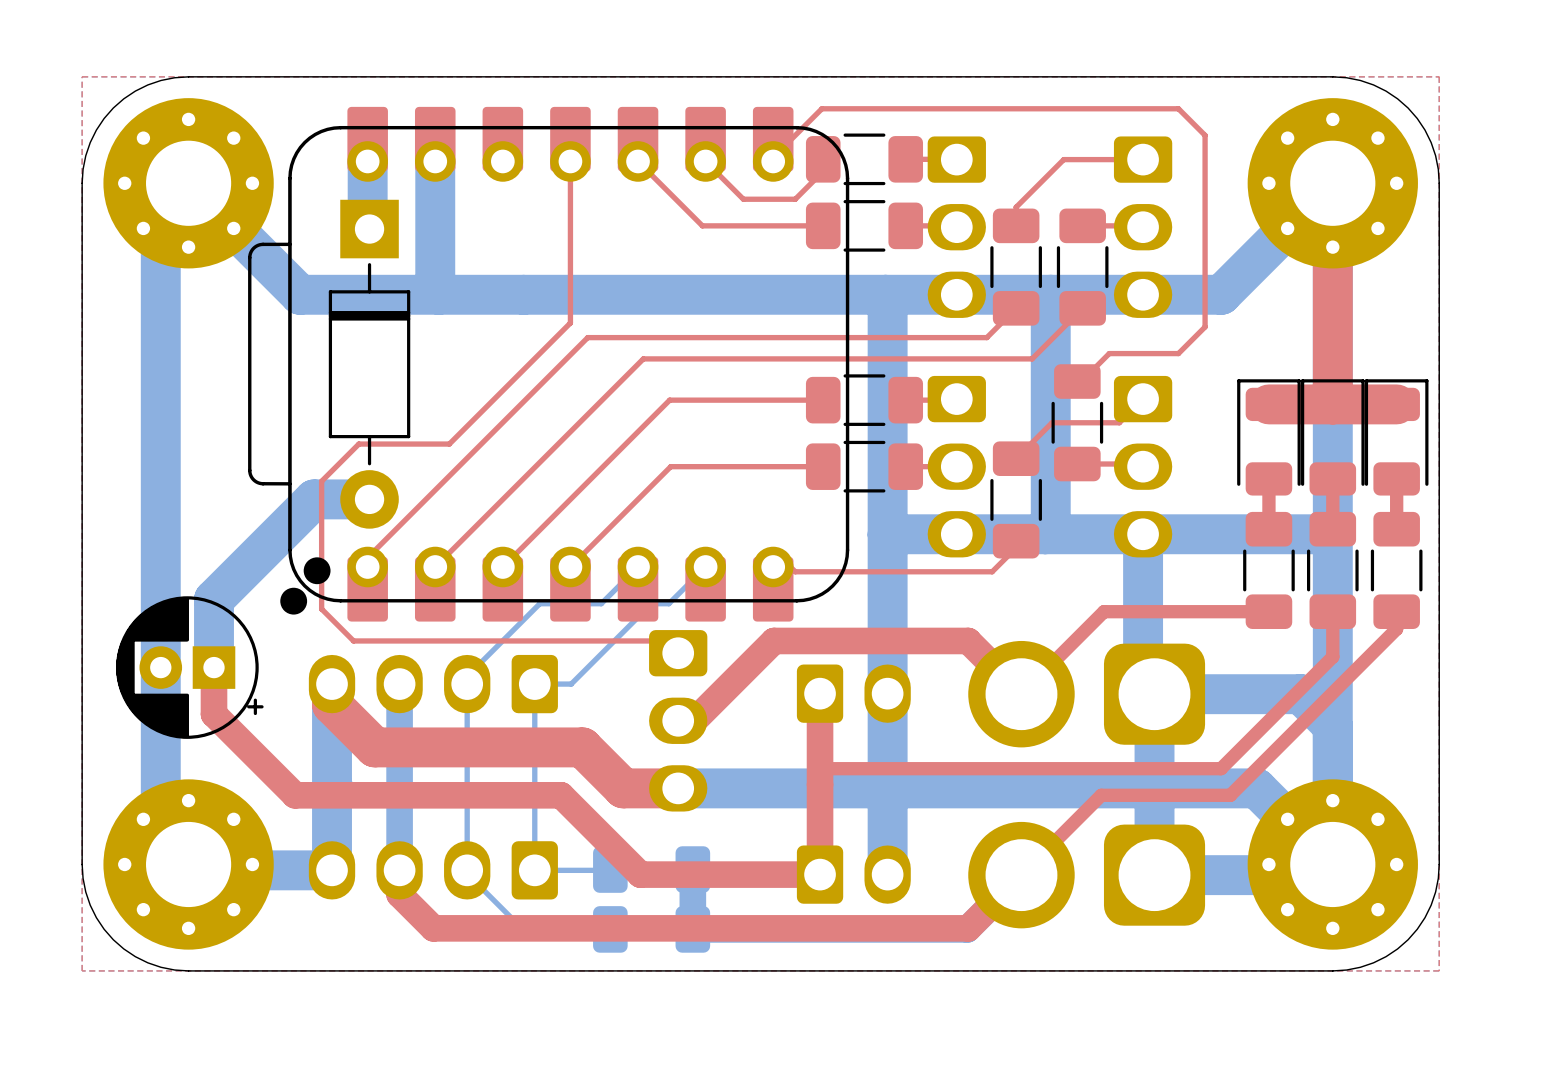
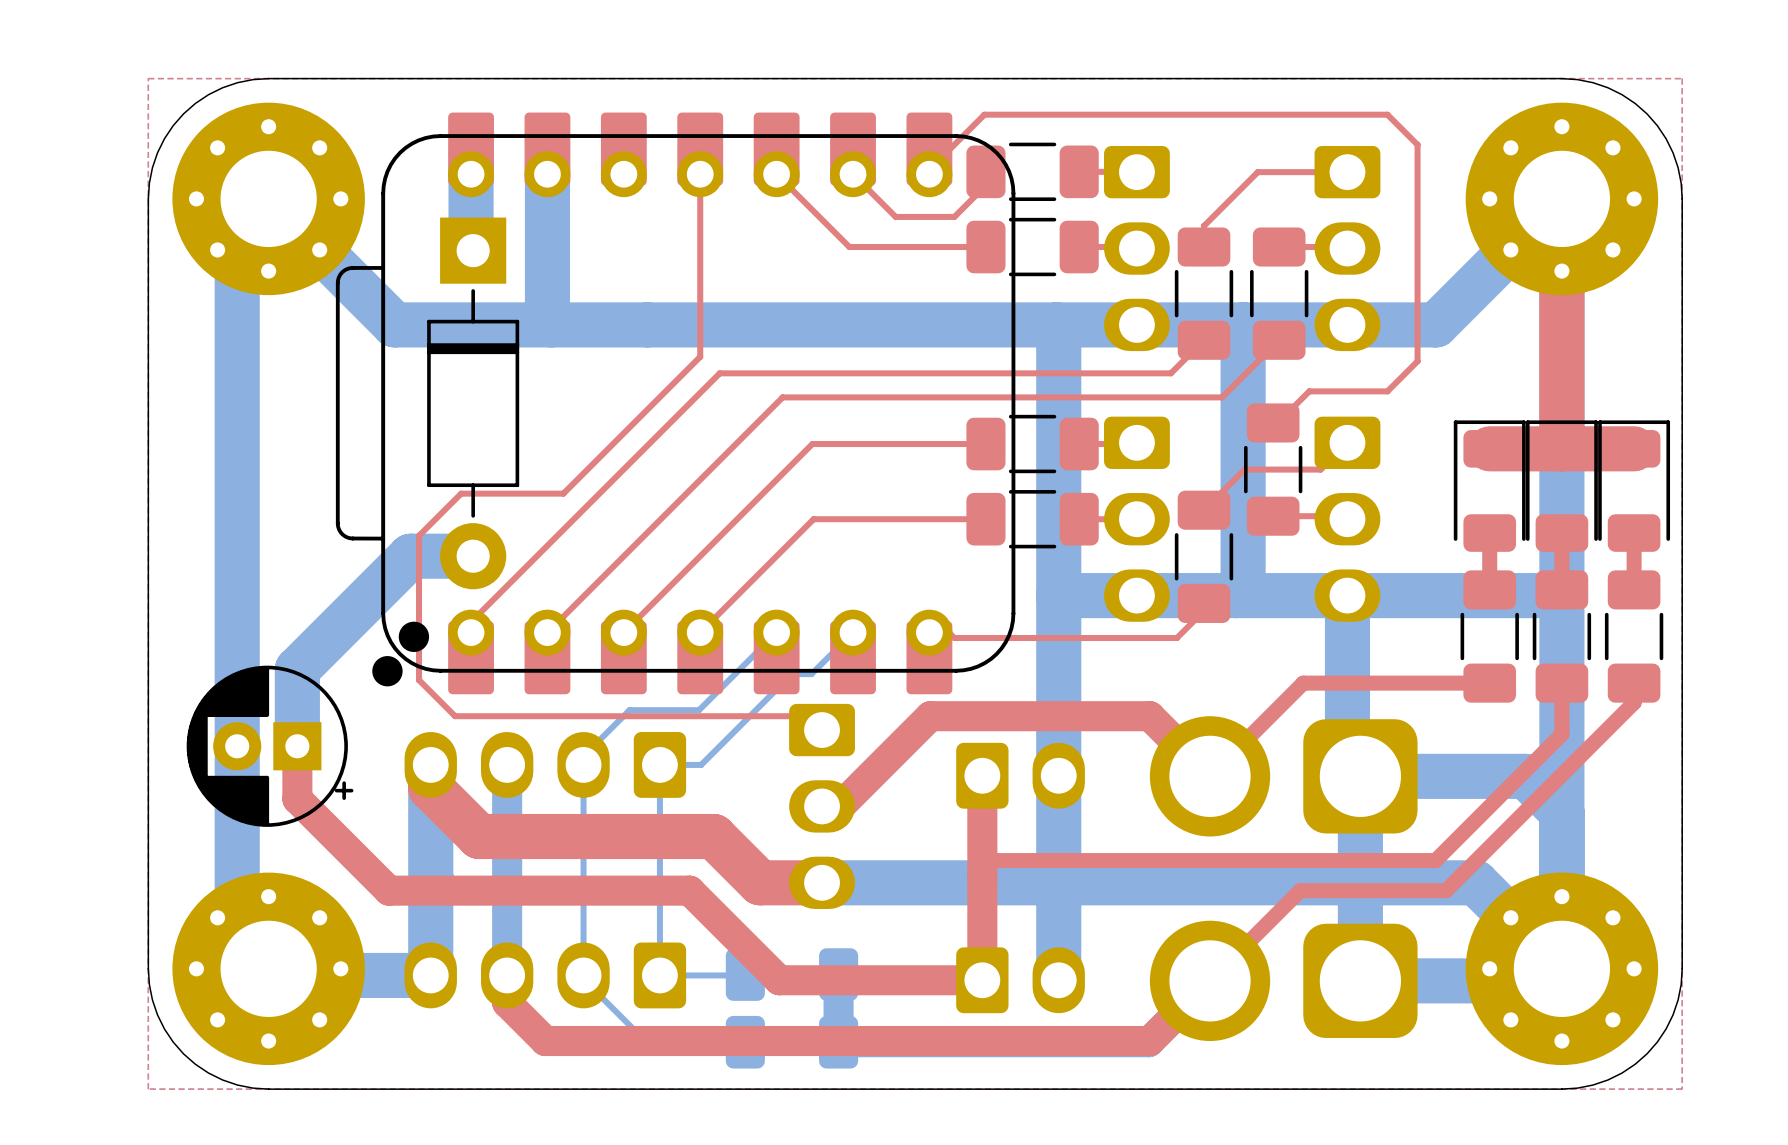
bottom track: (601, 603) (539, 603) (507, 635) -> (735, 674) (699, 710) (629, 710)

